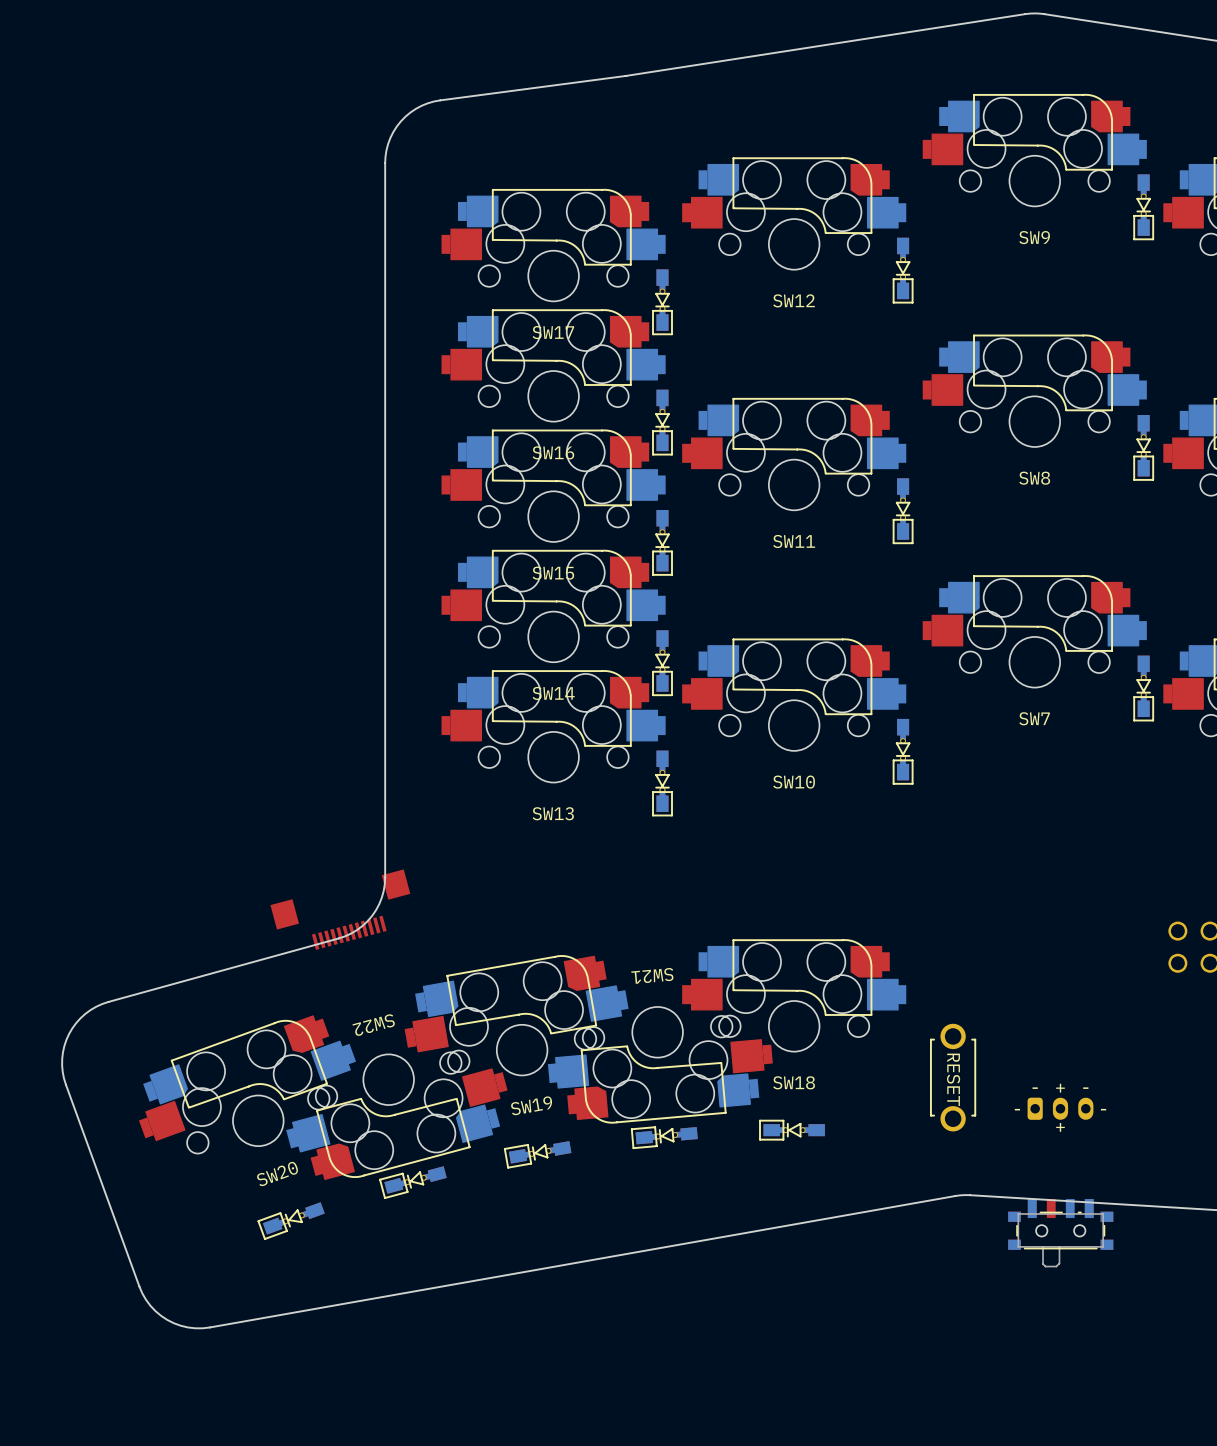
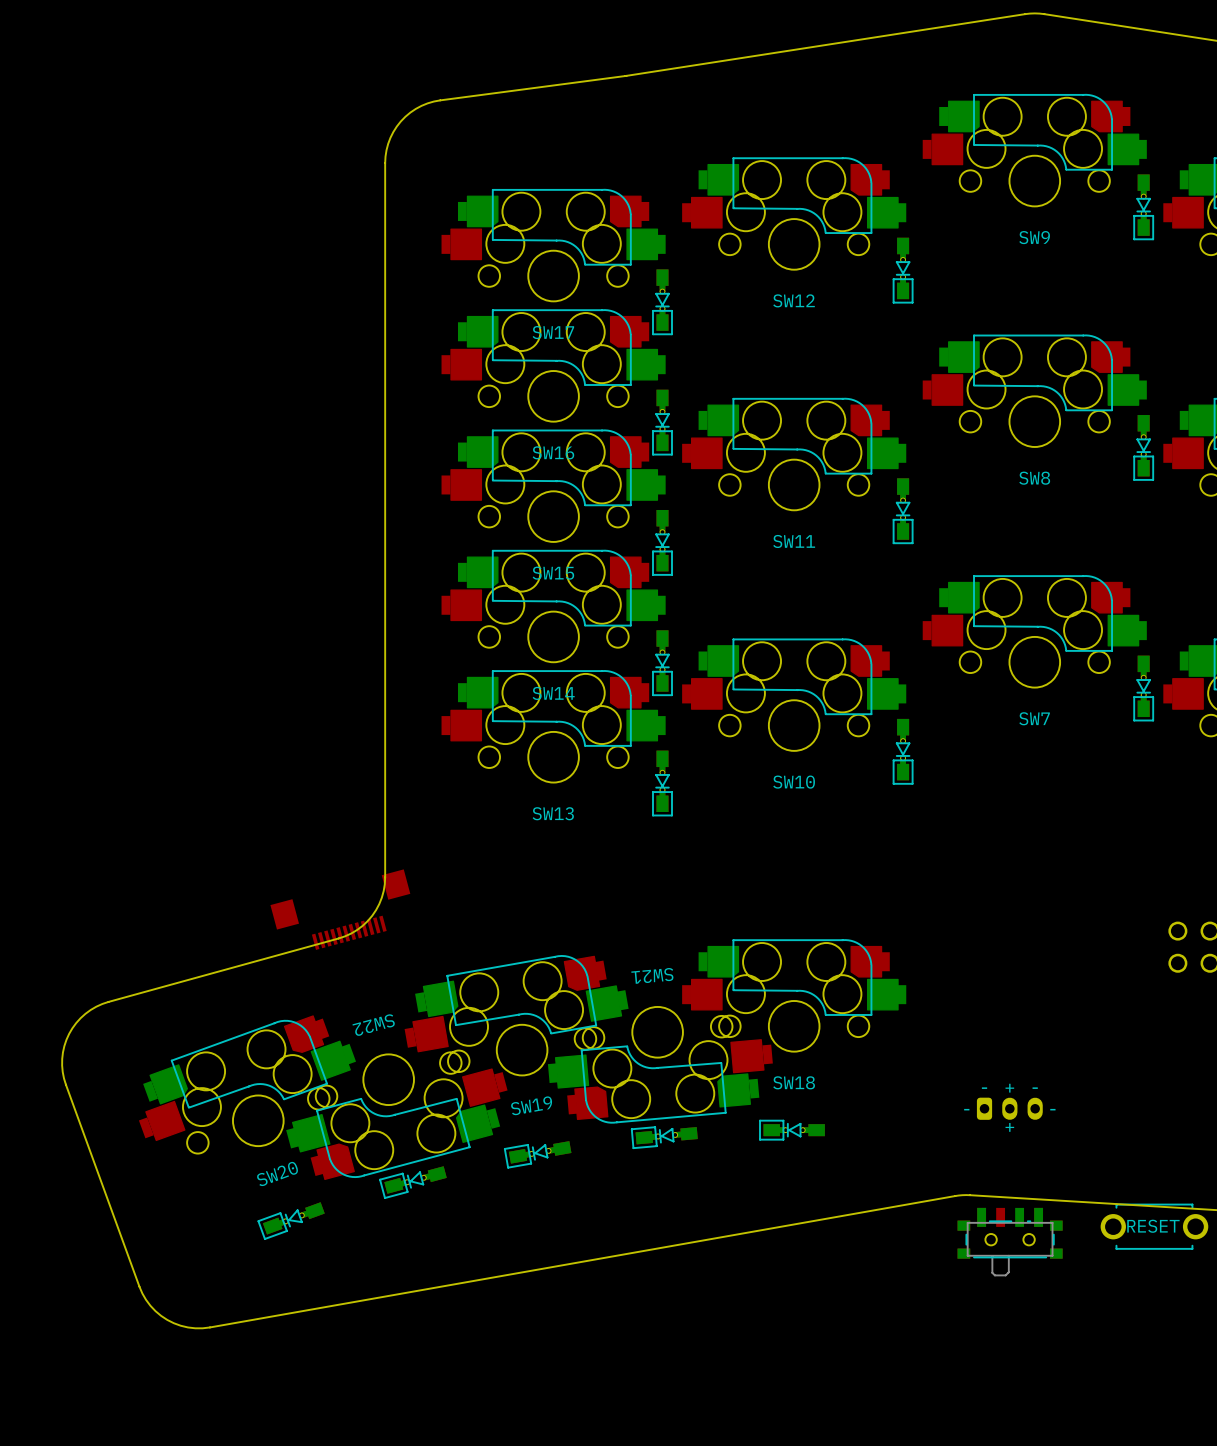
part rotation: 0° (953, 1077) -> 90° clockwise (1154, 1226)
part position: (953, 1077) -> (1154, 1226)
part position: (1060, 1108) -> (1009, 1108)
part position: (1060, 1233) -> (1010, 1241)

